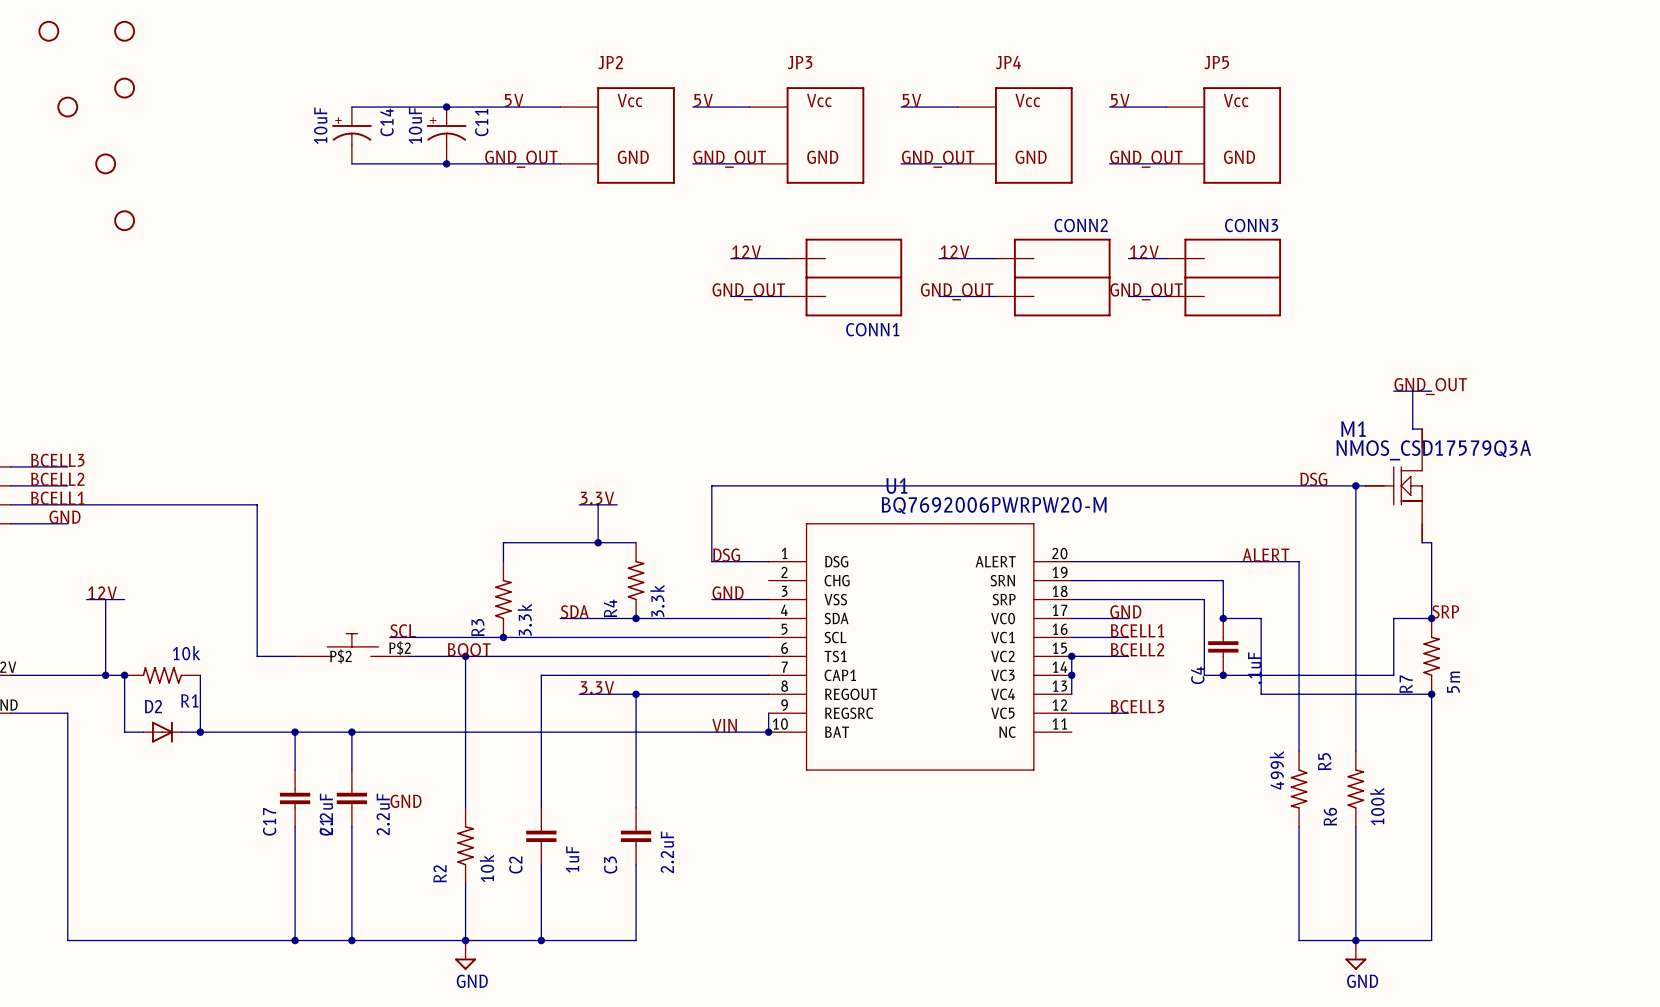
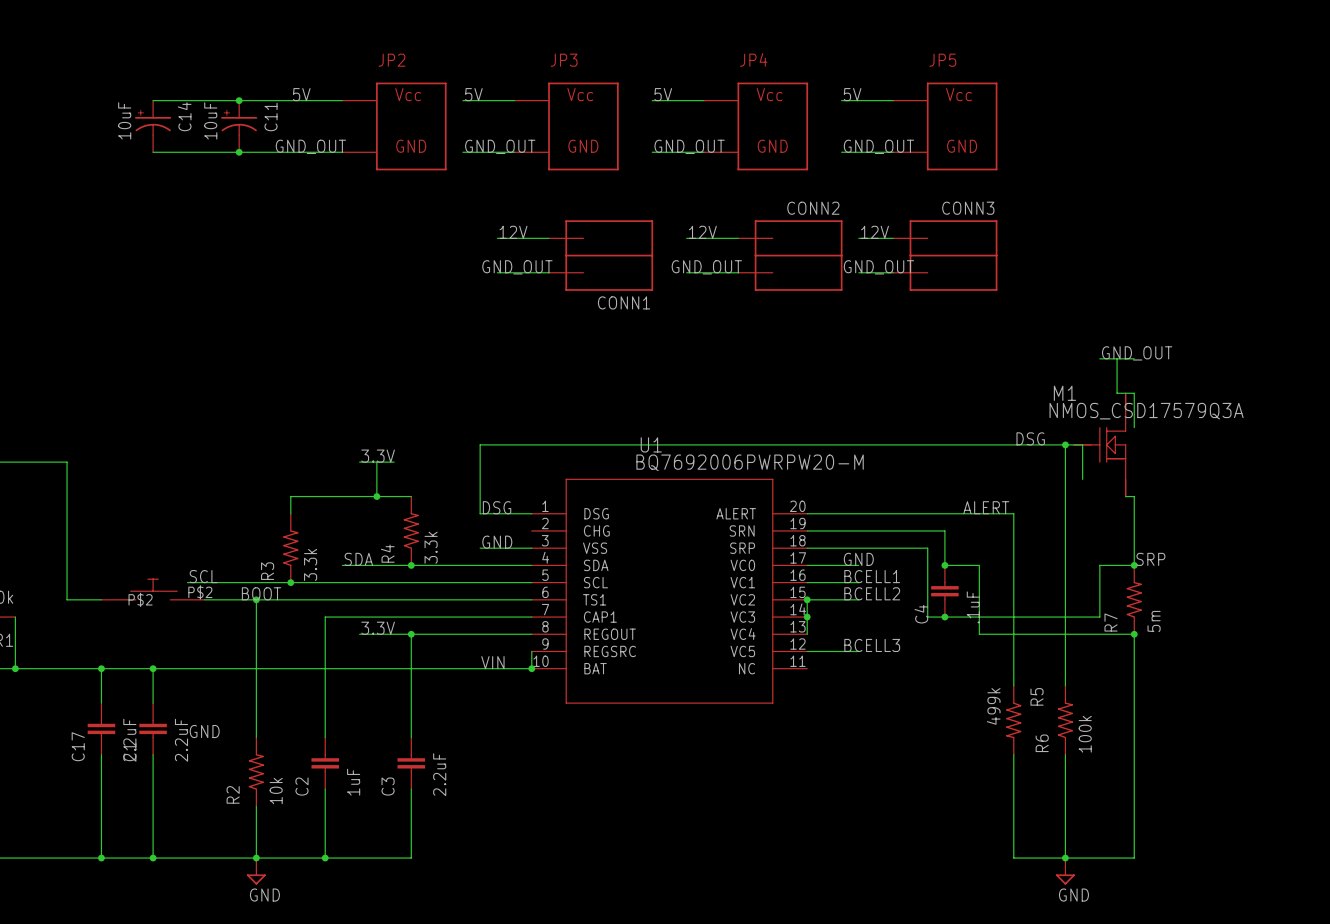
wire: none -> (1125, 393) (1134, 393) (1134, 427)
wire: none -> (1074, 444) (1082, 444) (1082, 479)

